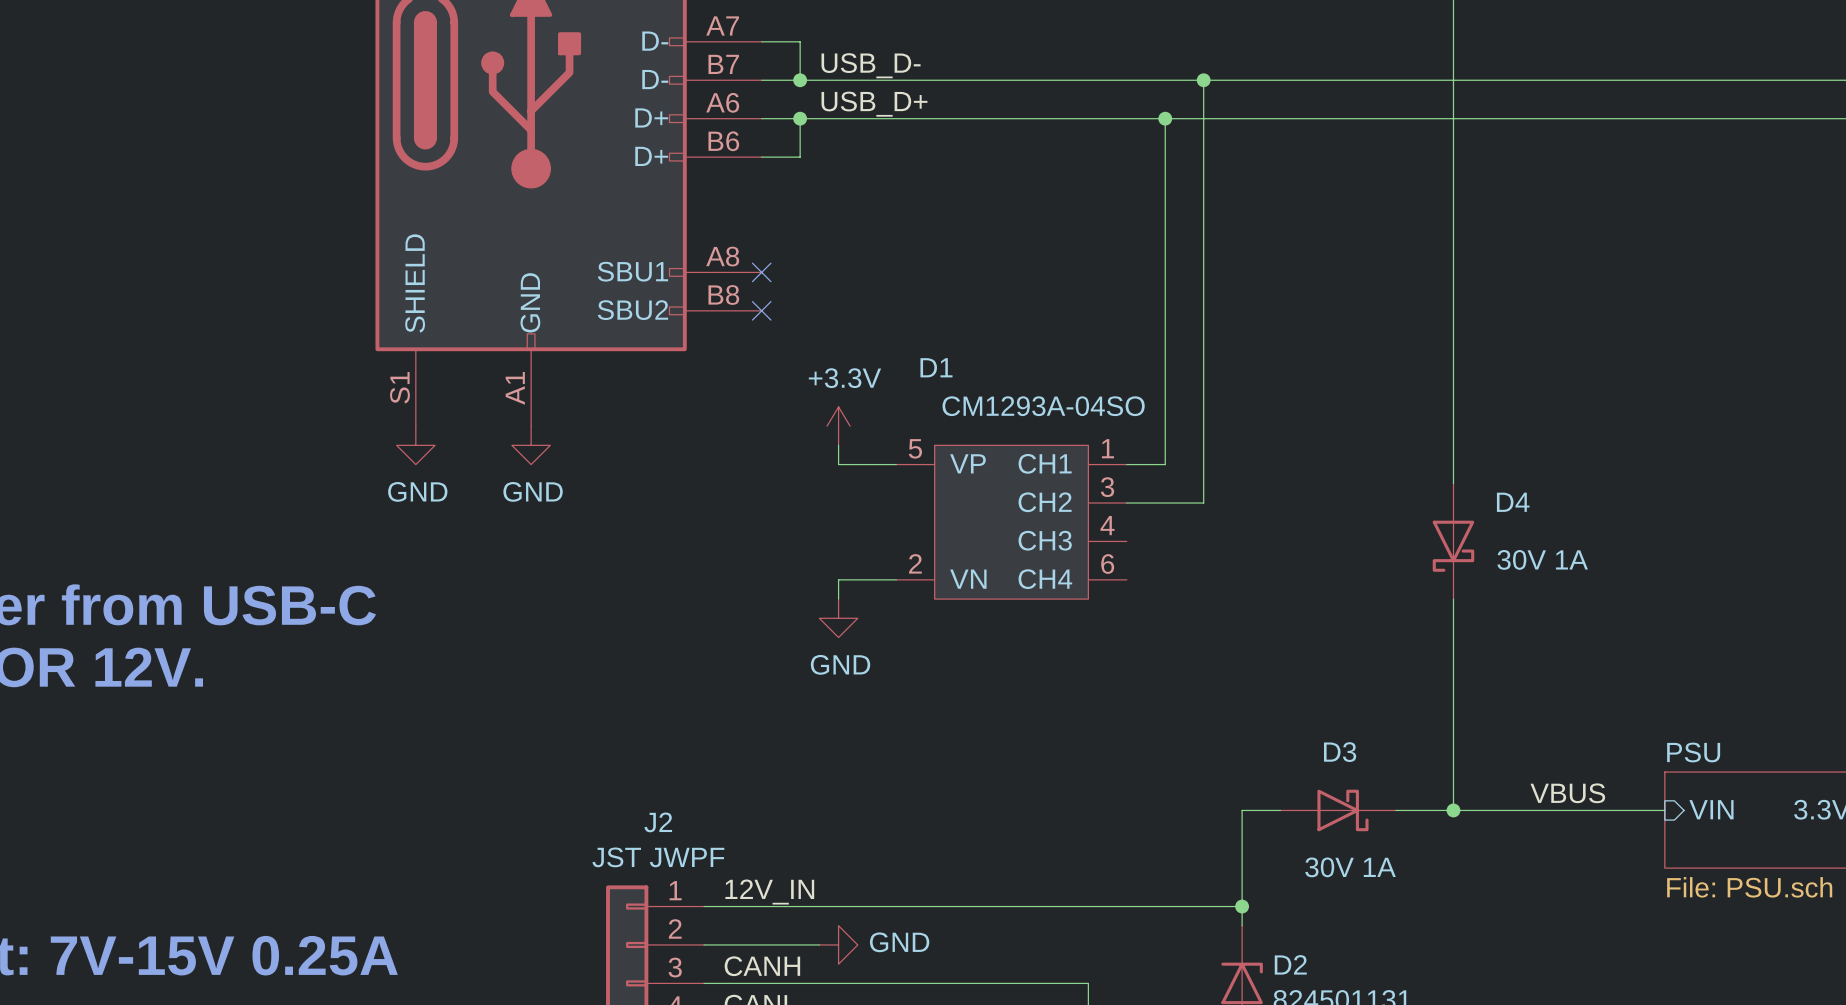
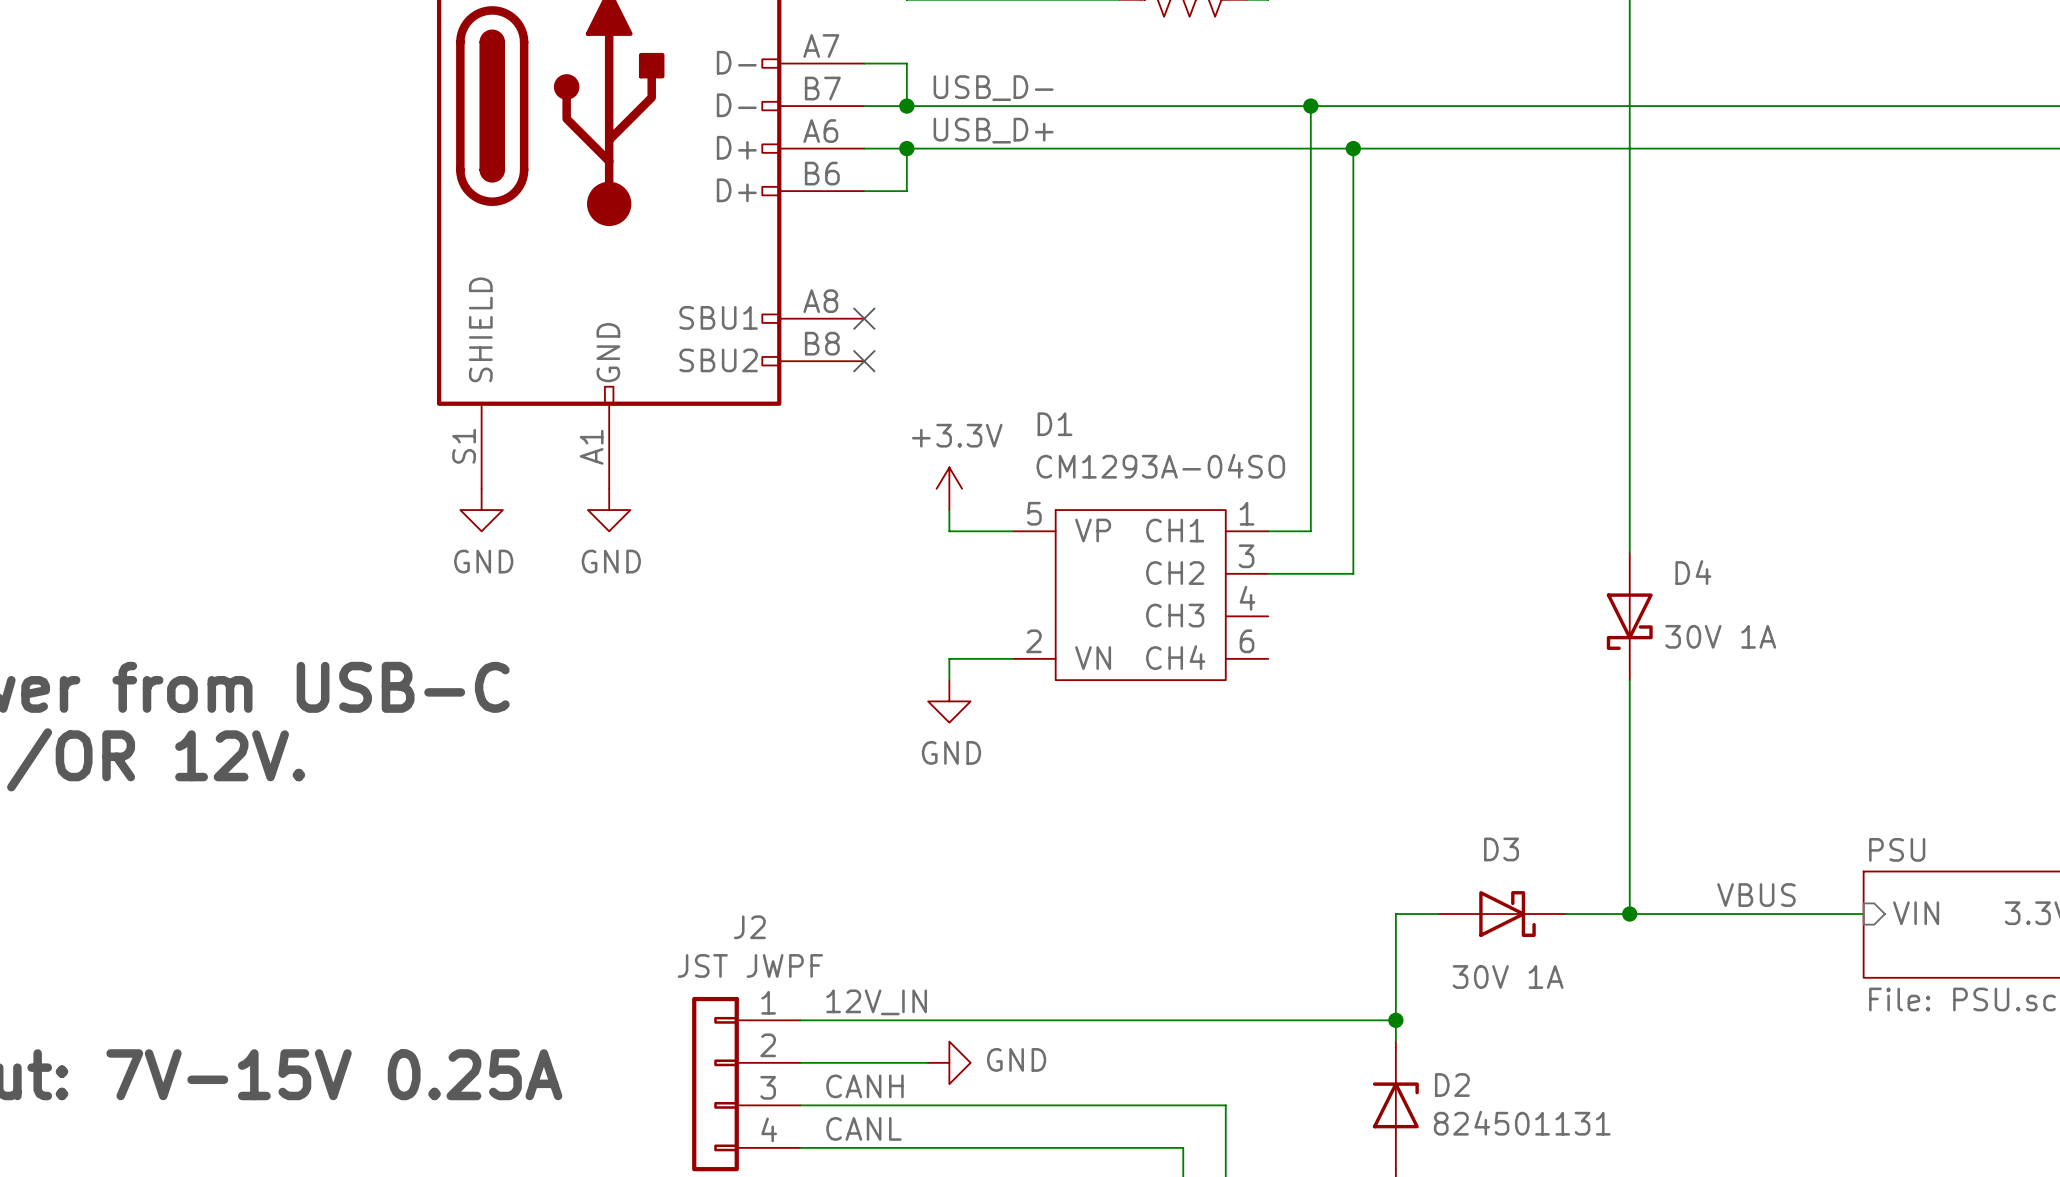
junction: none -> (1310, 106)
wire: (1203, 80) (1203, 118) -> (1310, 106) (1310, 148)
junction: (1203, 80) -> none
junction: (1165, 118) -> none
junction: none -> (1353, 148)

